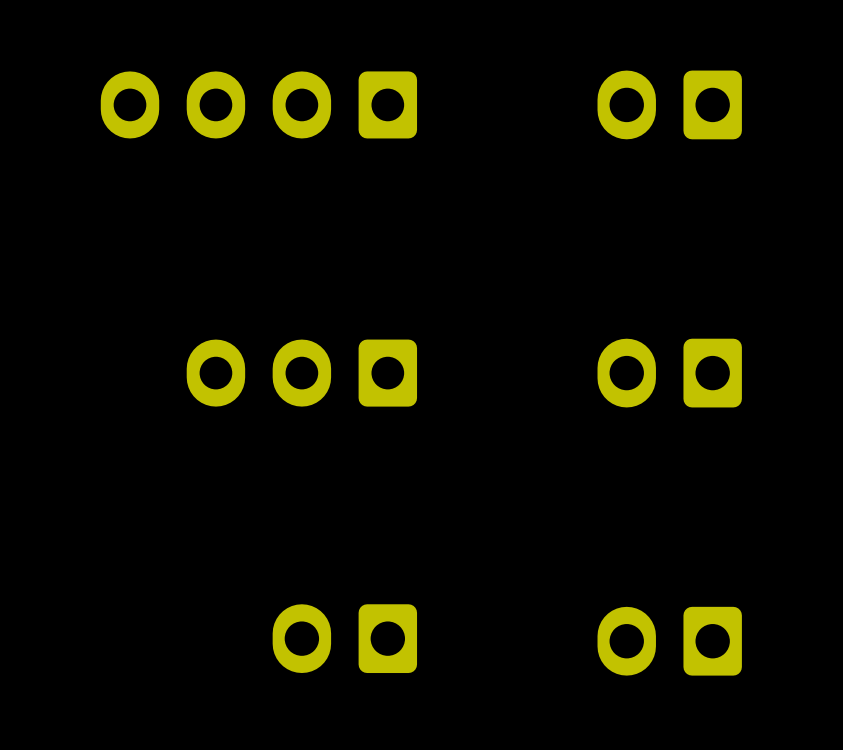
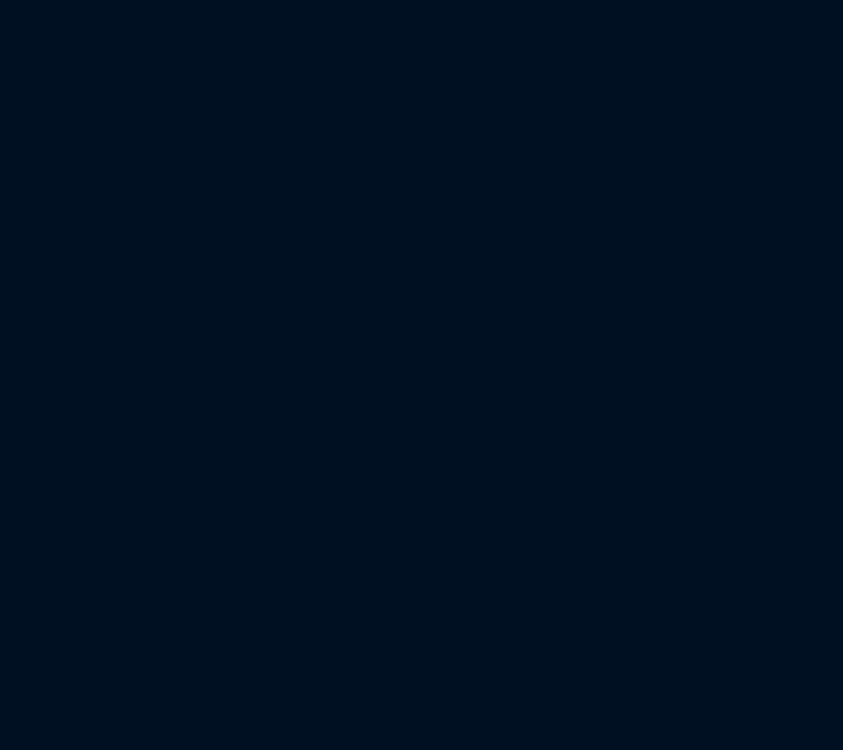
part: (258, 104) -> none
part: (669, 104) -> none
part: (301, 373) -> none
part: (669, 373) -> none
part: (344, 638) -> none
part: (669, 641) -> none

